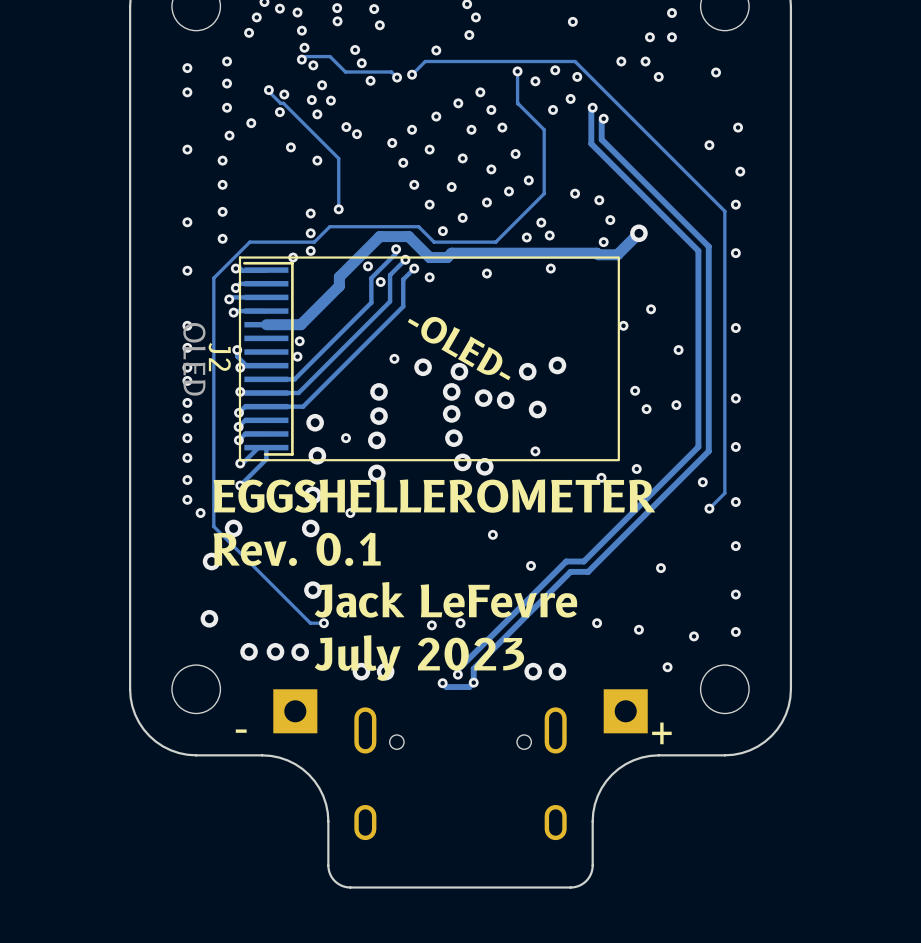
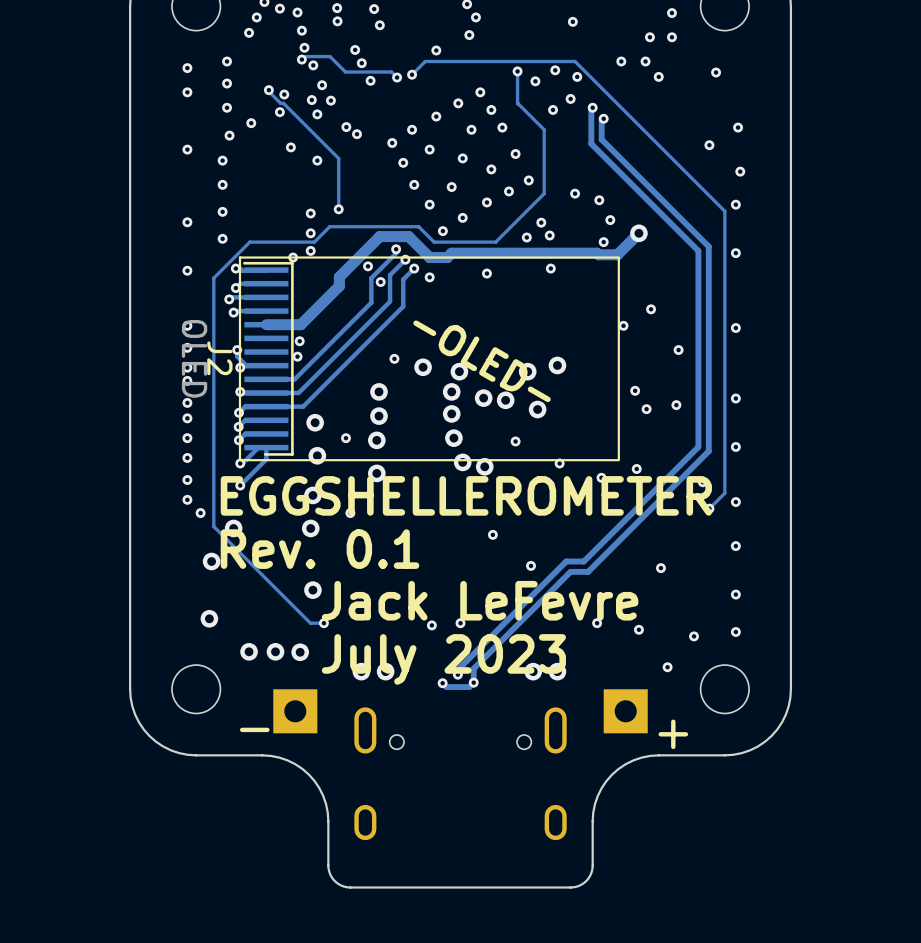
via: none -> (515, 441)
via: (535, 451) -> none
via: none -> (559, 463)

